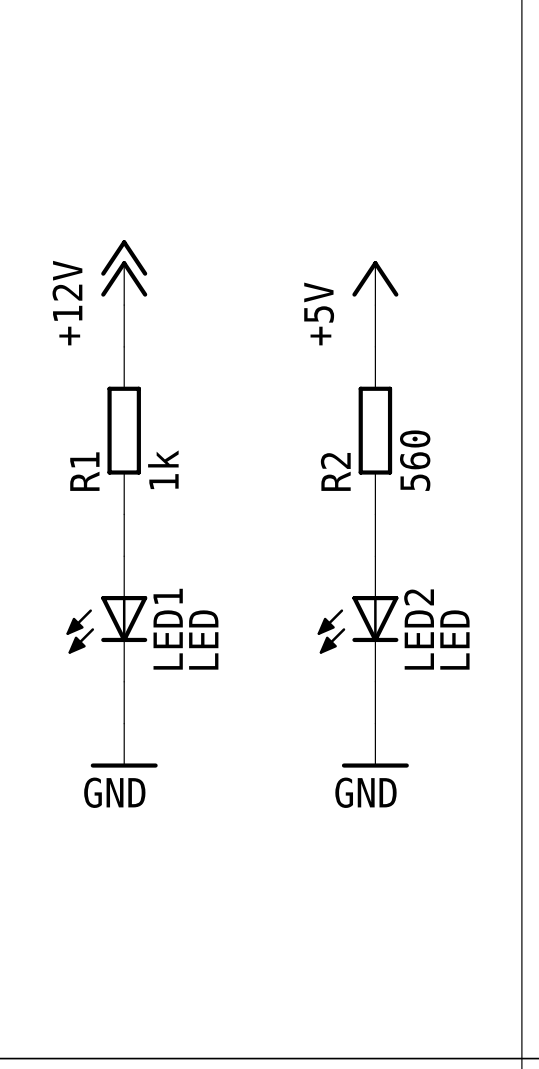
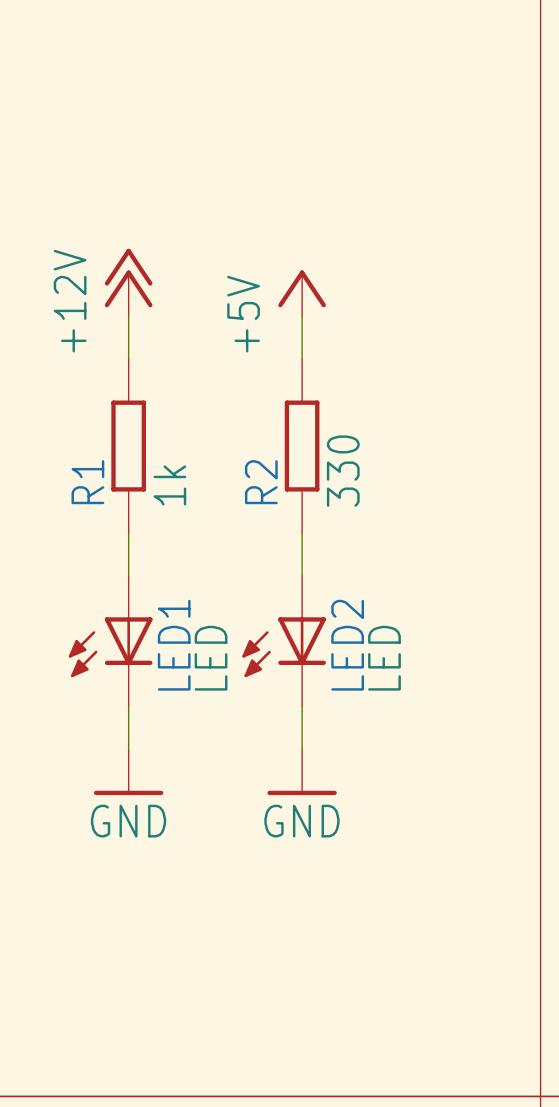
power symbol position: +5V (375, 283) -> +5V (302, 293)
wire: (375, 305) (375, 346) -> (302, 315) (302, 359)
R2 position: (375, 430) -> (302, 446)
R2 value: 560 (415, 460) -> 330 (343, 471)
wire: (375, 514) (375, 556) -> (302, 532) (302, 576)
LED2 position: (358, 619) -> (284, 641)
wire: (375, 681) (375, 723) -> (302, 706) (302, 749)
power symbol position: GND (375, 745) -> GND (302, 772)

